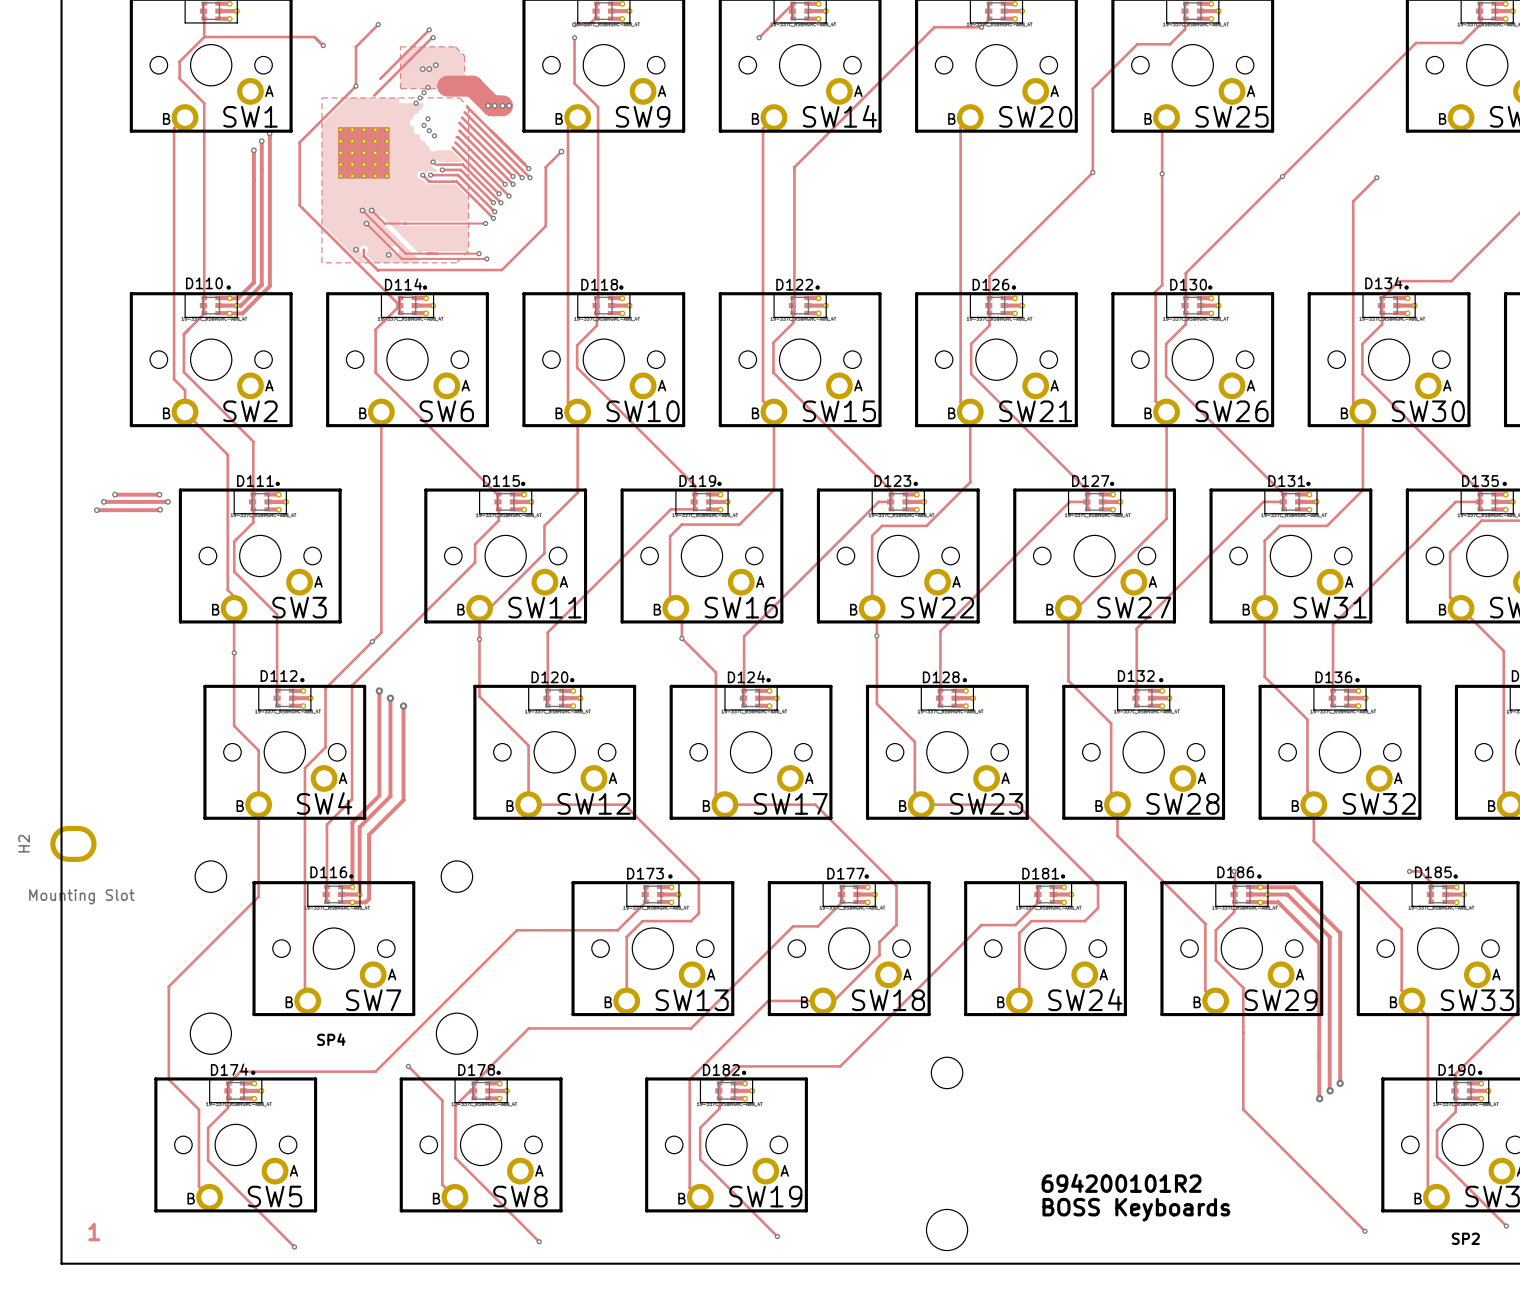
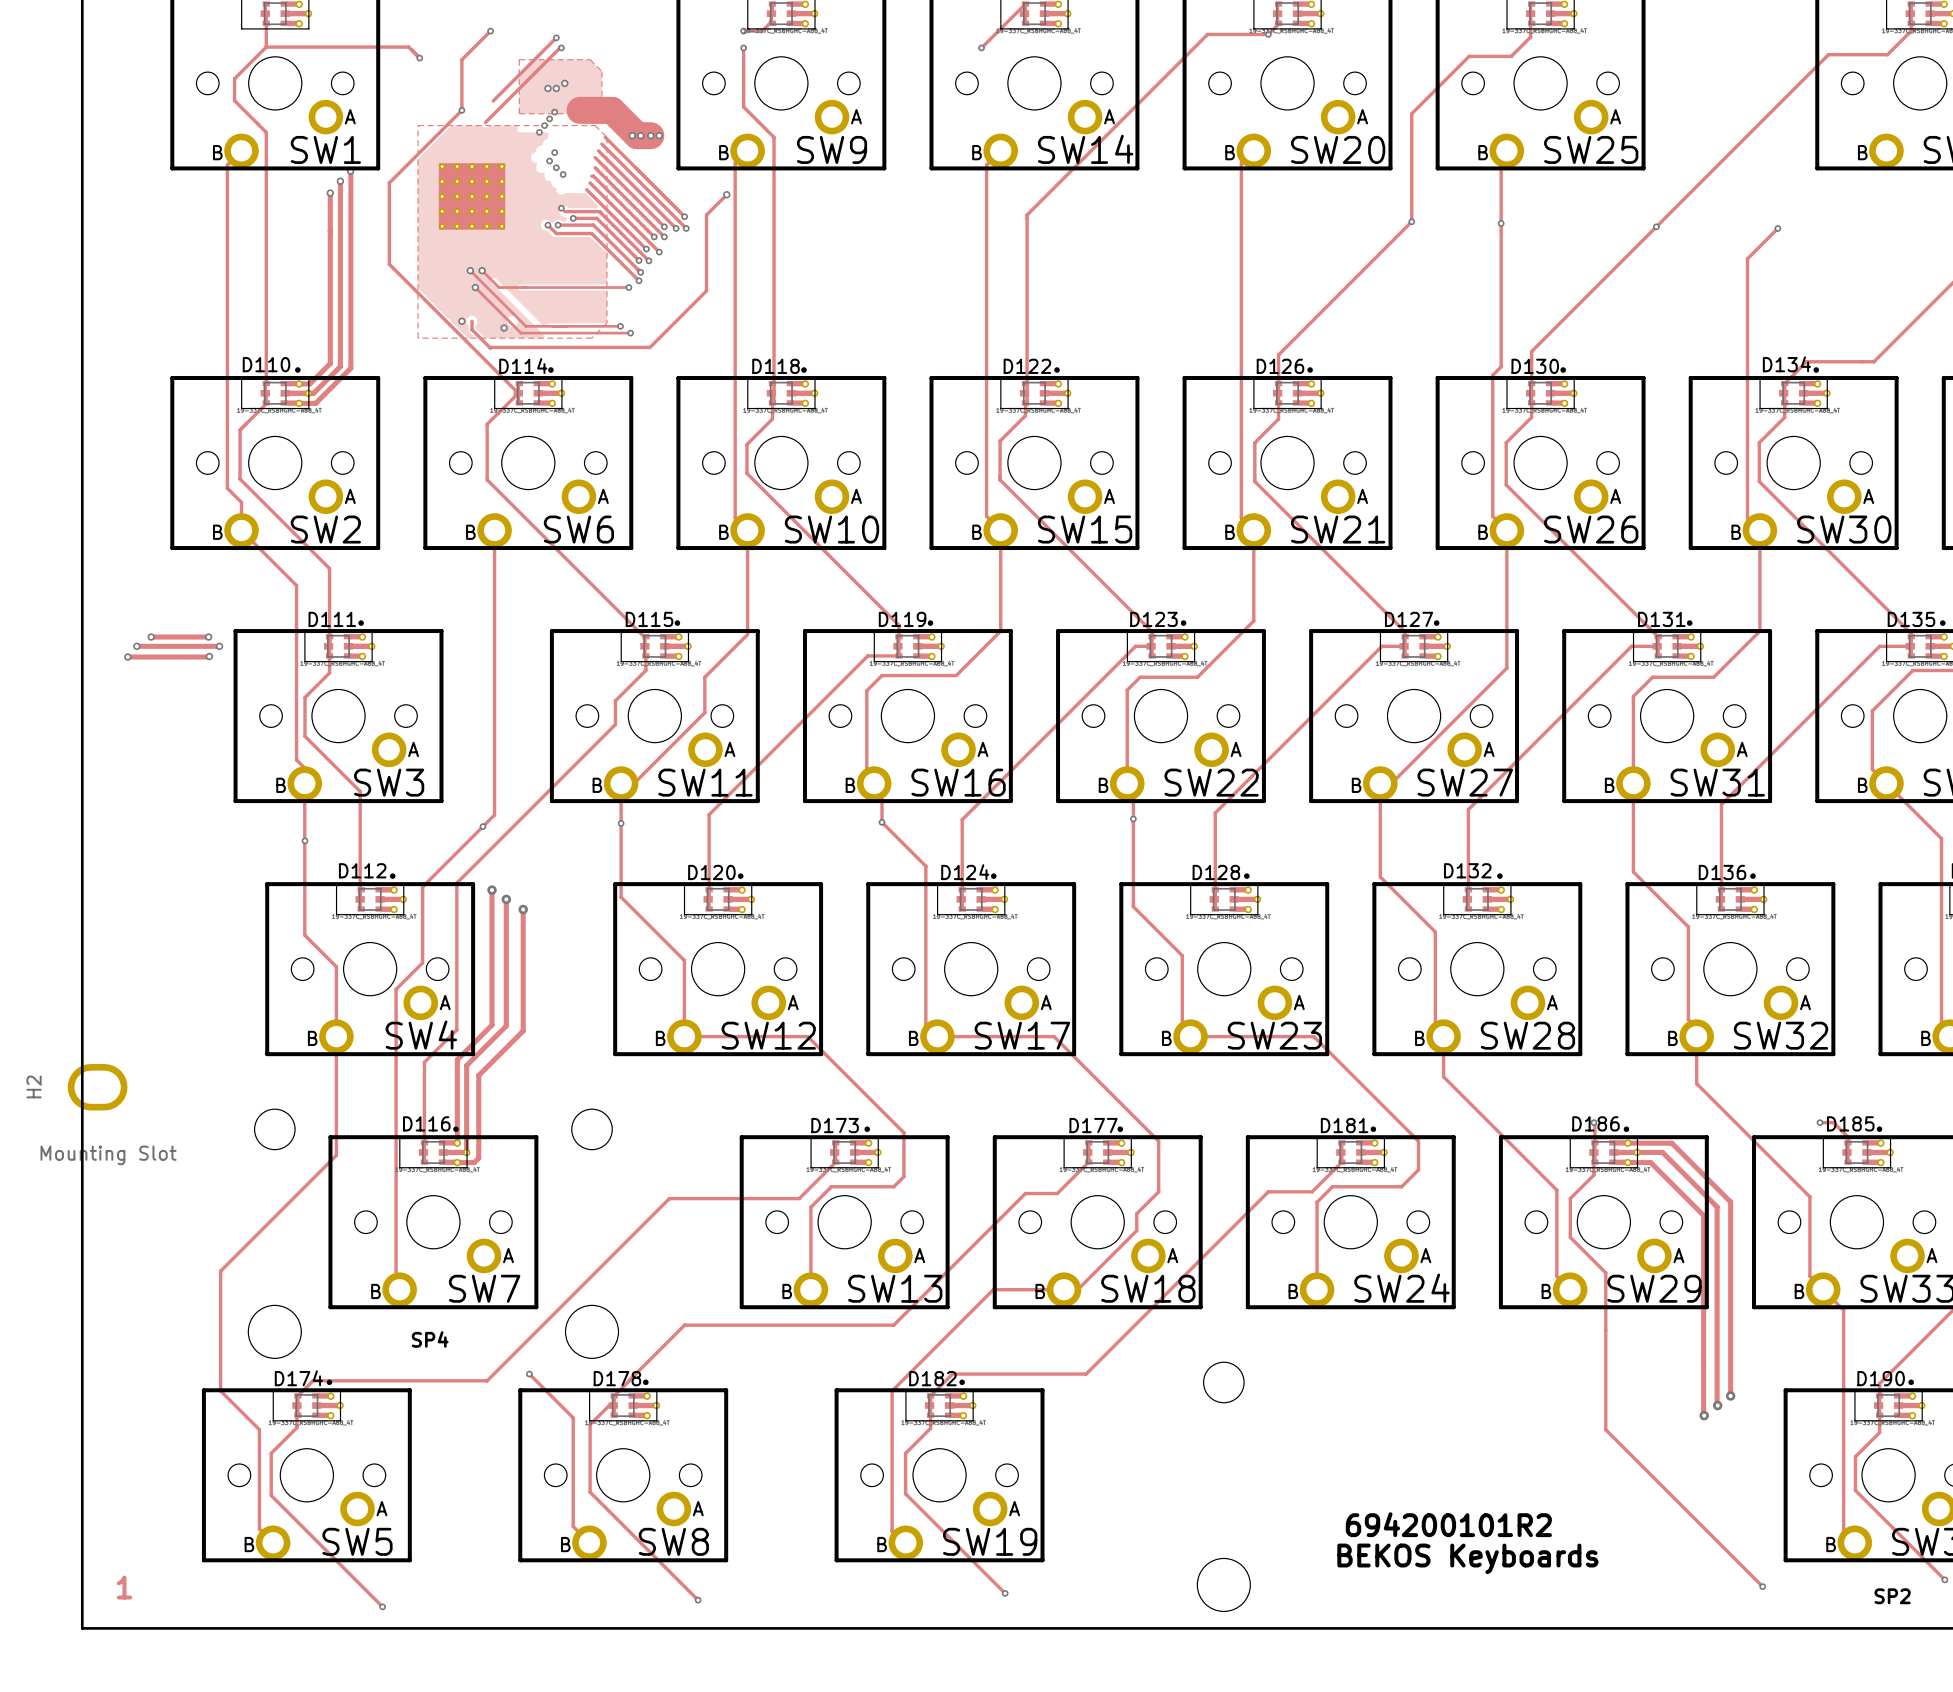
text: BOSS Keyboards (1136, 1209) -> BEKOS Keyboards (1467, 1558)

